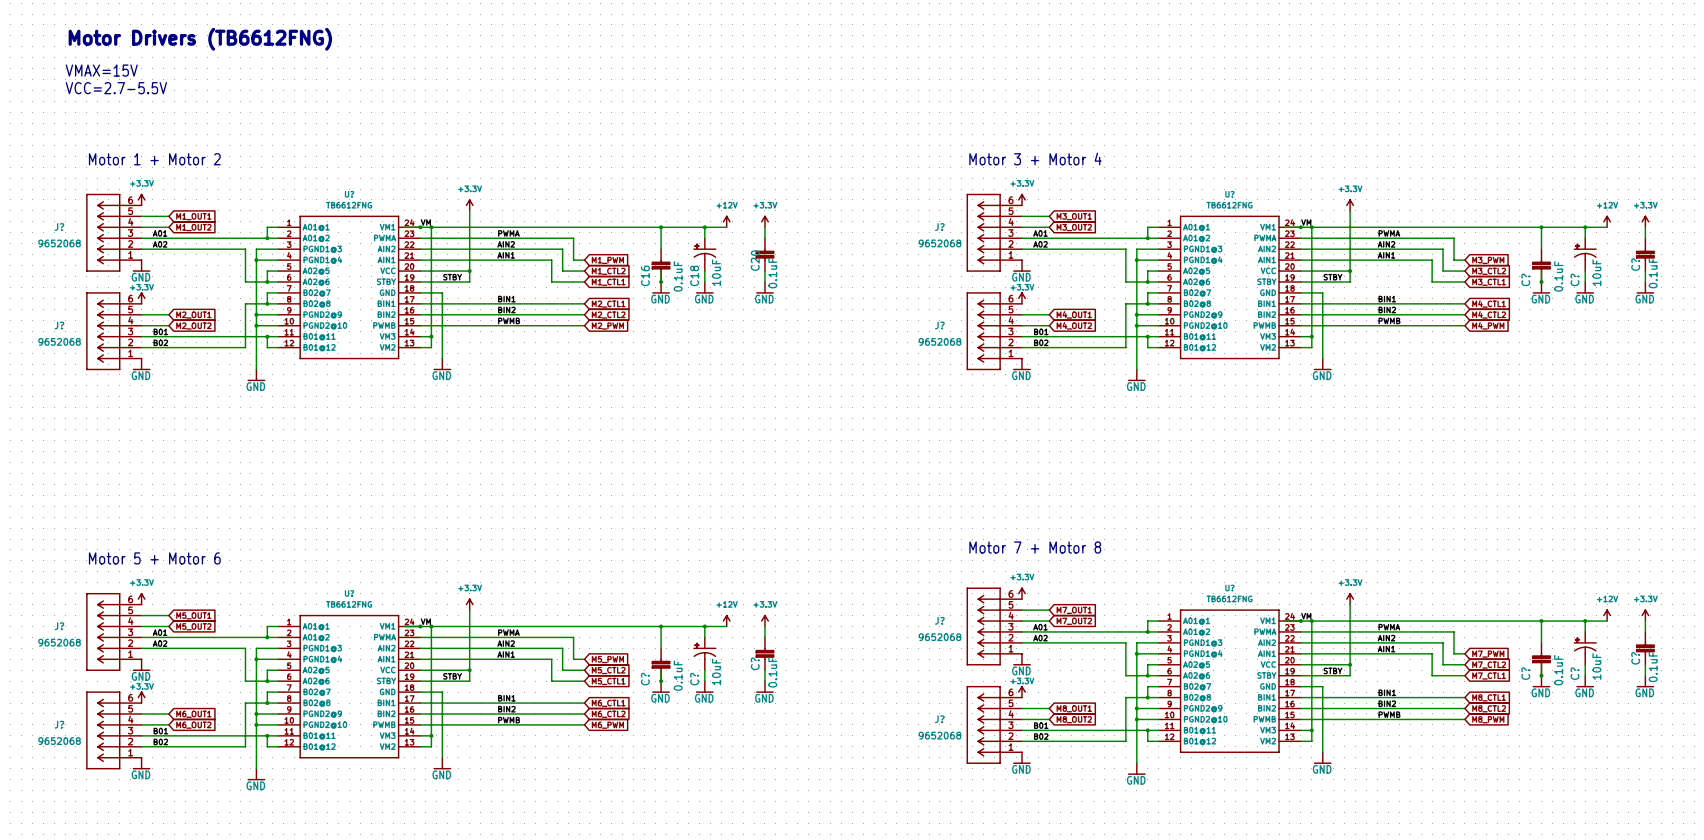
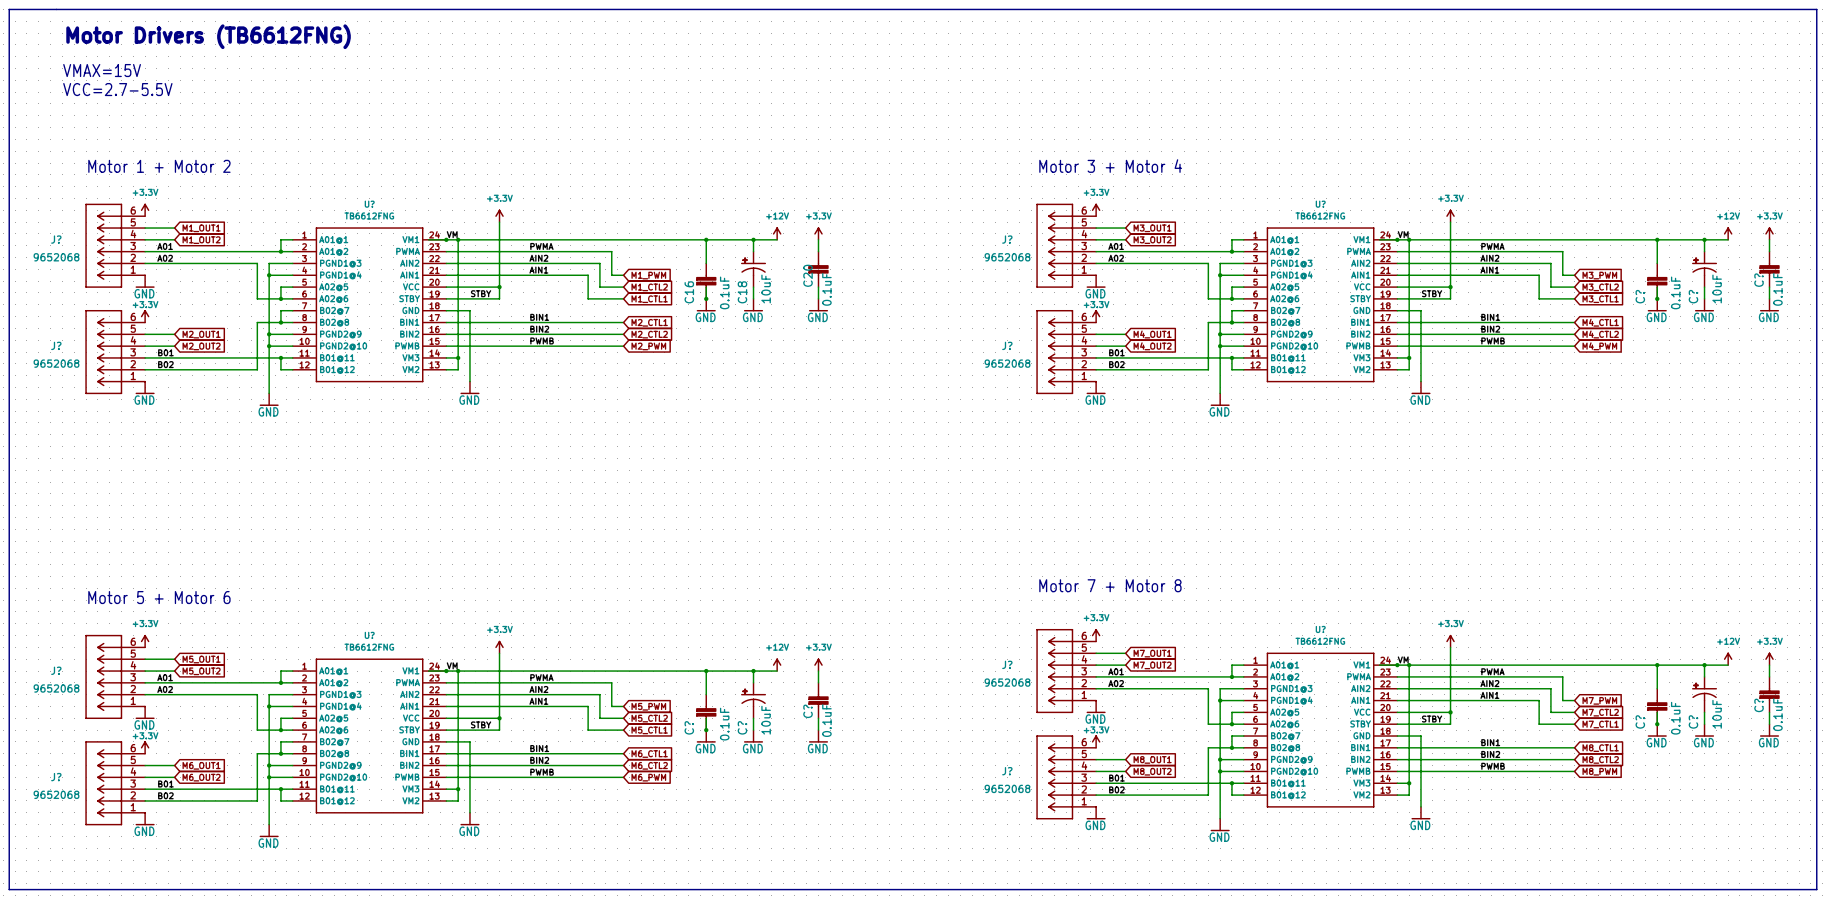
line: none -> (9, 9) (9, 889) (1816, 889) (1816, 9) (9, 9)

